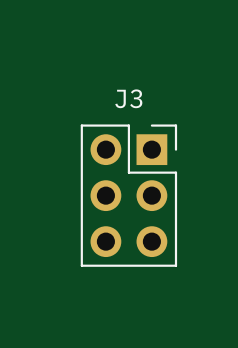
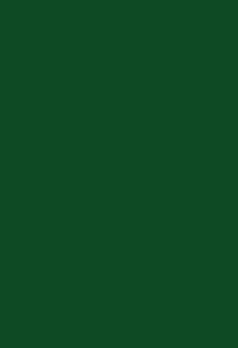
J3: (128, 195) -> none

